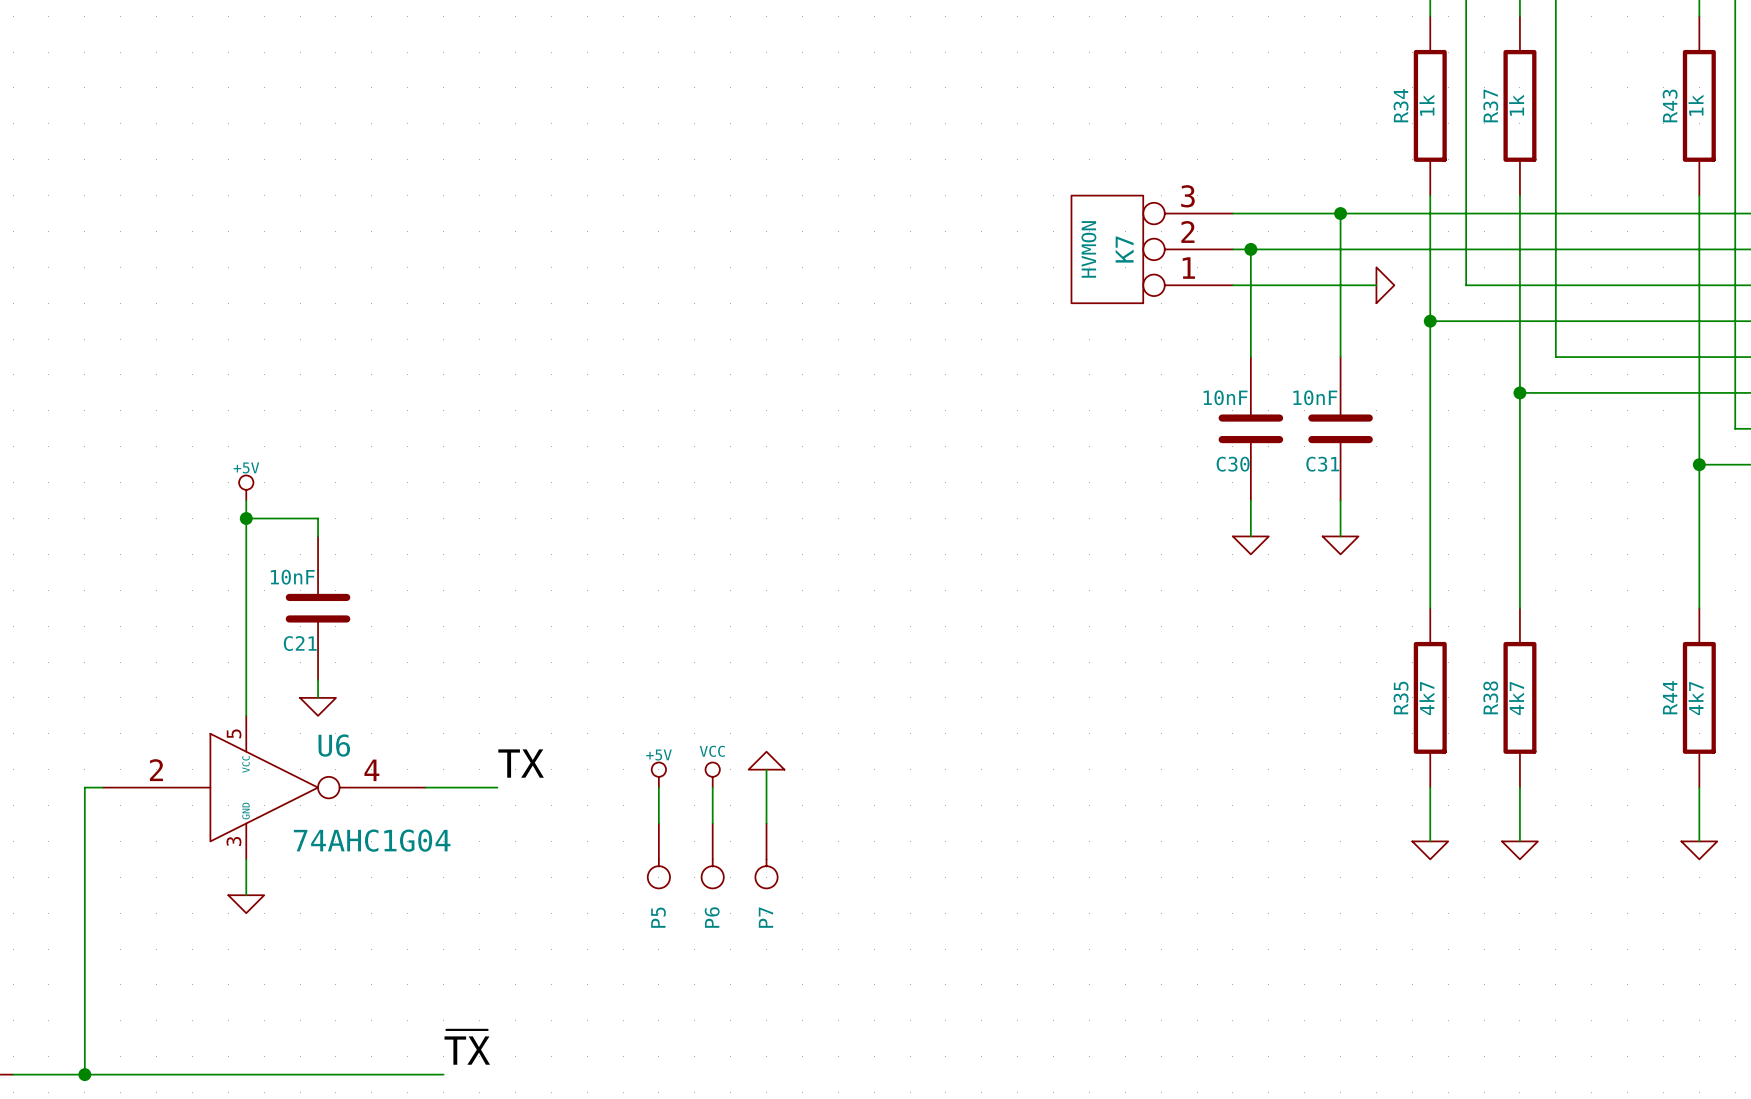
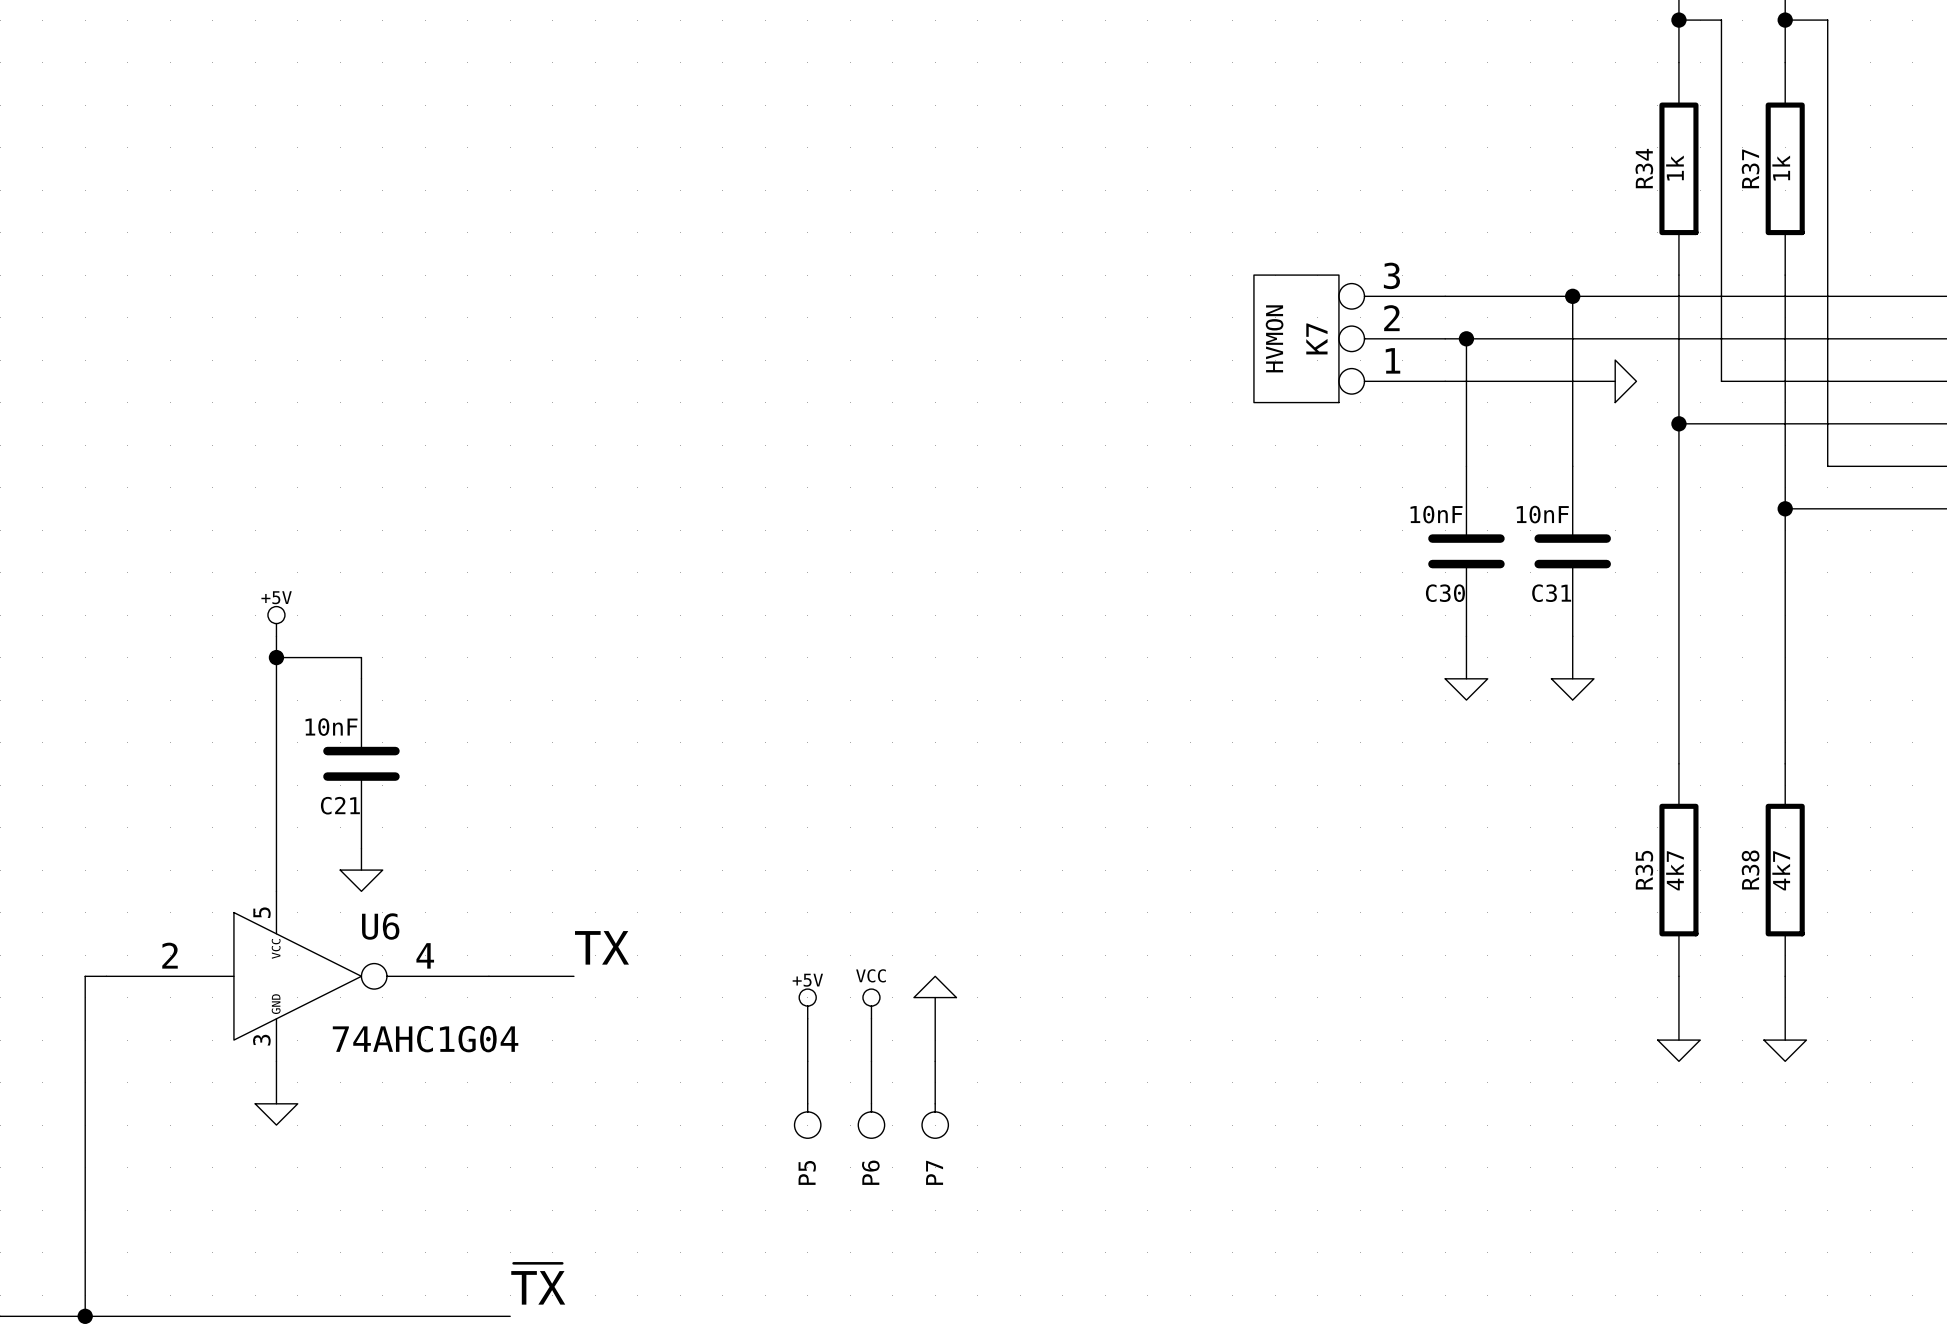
power symbol position: (766, 760) -> (935, 986)
wire: (766, 769) (766, 823) -> (935, 997) (935, 1061)
power symbol position: +5V (658, 775) -> +5V (807, 1003)
power symbol position: VCC (712, 775) -> VCC (871, 1003)
wire: (658, 787) (658, 823) -> (871, 1018) (871, 1061)
wire: (712, 787) (712, 823) -> (807, 1018) (807, 1061)
P5 position: (658, 855) -> (807, 1099)
P6 position: (712, 855) -> (871, 1099)
P7 position: (766, 855) -> (935, 1099)

